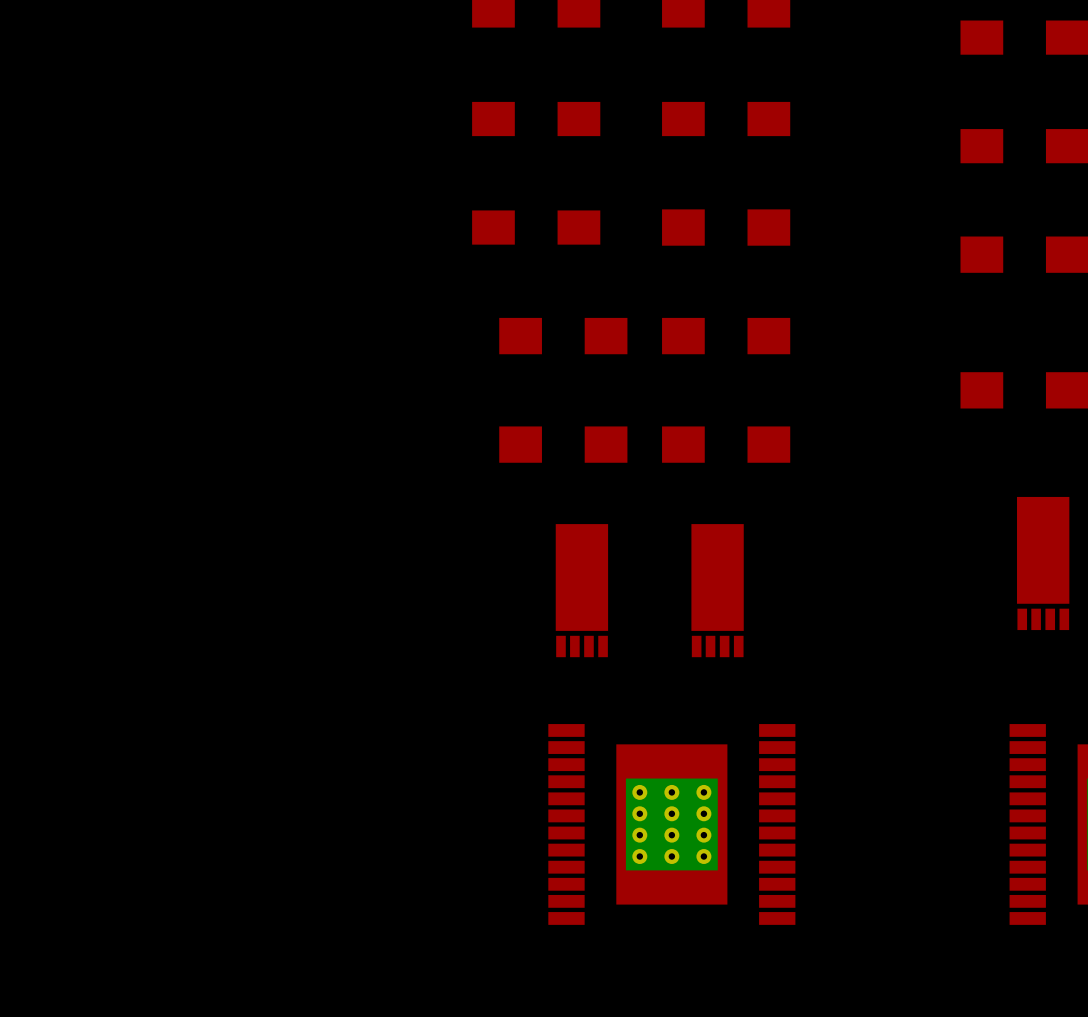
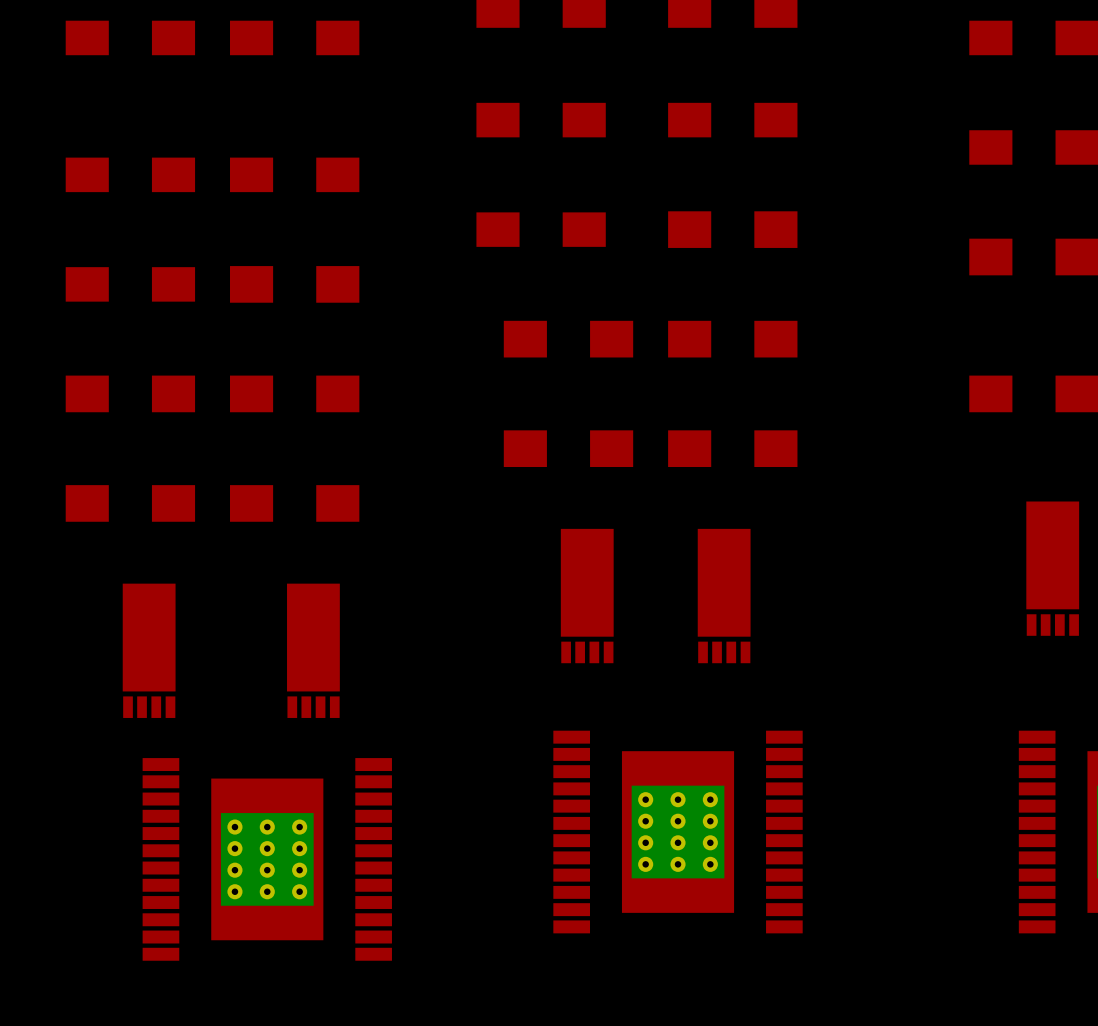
part: none -> (130, 37)
part: none -> (294, 37)
part: none -> (130, 174)
part: none -> (294, 174)
part: none -> (130, 284)
part: none -> (294, 284)
part: none -> (130, 393)
part: none -> (294, 393)
part: none -> (130, 503)
part: none -> (294, 503)
part: none -> (149, 650)
part: none -> (313, 650)
part: none -> (267, 859)

